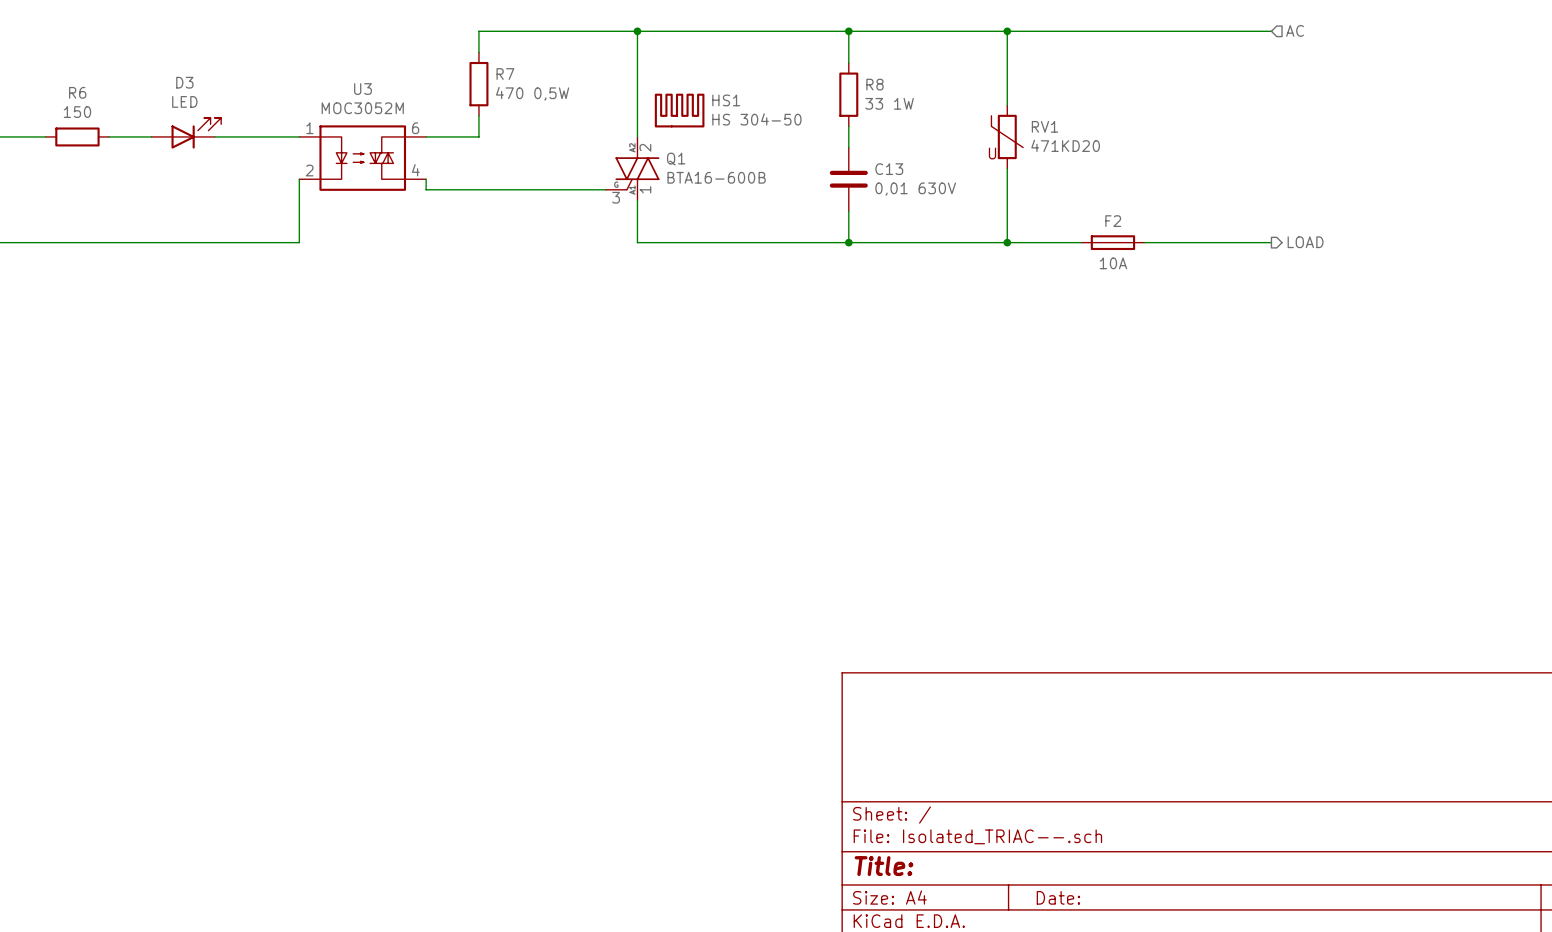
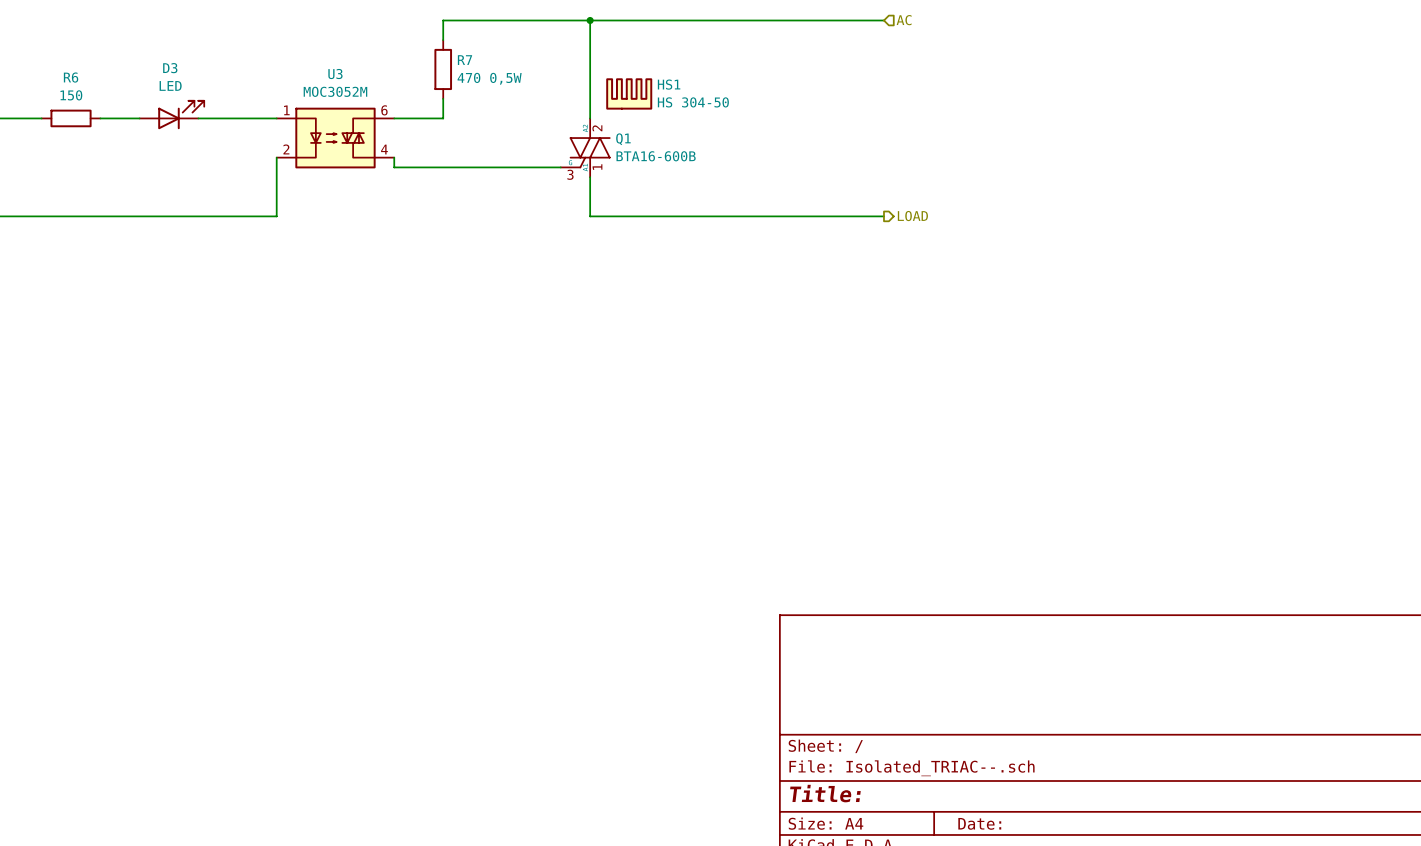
hierarchical label: none -> AC (904, 20)
hierarchical label: AC (1295, 30) -> none
wire: (848, 31) (848, 63) -> none
junction: (848, 31) -> none
wire: (954, 31) (1271, 31) -> none
wire: (1007, 31) (1007, 105) -> none
junction: (1007, 31) -> none
R8: 33 1W (848, 94) -> none
wire: (848, 126) (848, 147) -> none
RV1: 471KD20 (1007, 136) -> none
wire: (1007, 168) (1007, 242) -> none
C13: 0,01 630V (848, 179) -> none
wire: (848, 210) (848, 242) -> none
junction: (848, 242) -> none
wire: (954, 242) (1081, 242) -> none
hierarchical label: none -> LOAD (912, 216)
junction: (1007, 242) -> none
F2: 10A (1112, 242) -> none
wire: (1144, 242) (1271, 242) -> none
hierarchical label: LOAD (1305, 242) -> none

